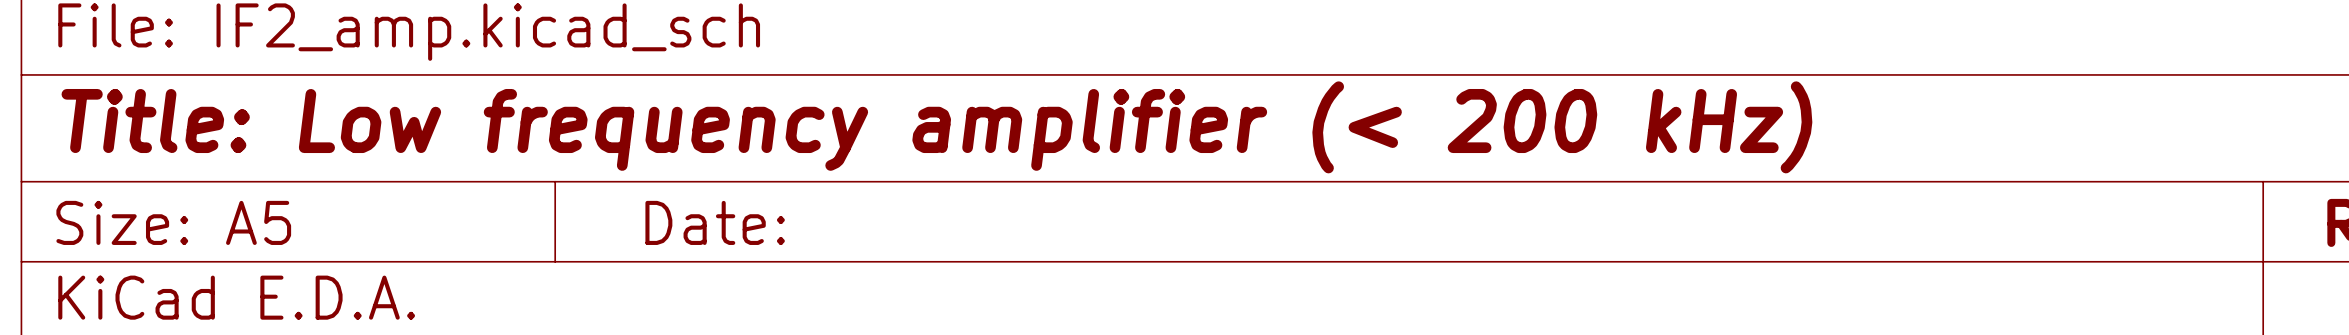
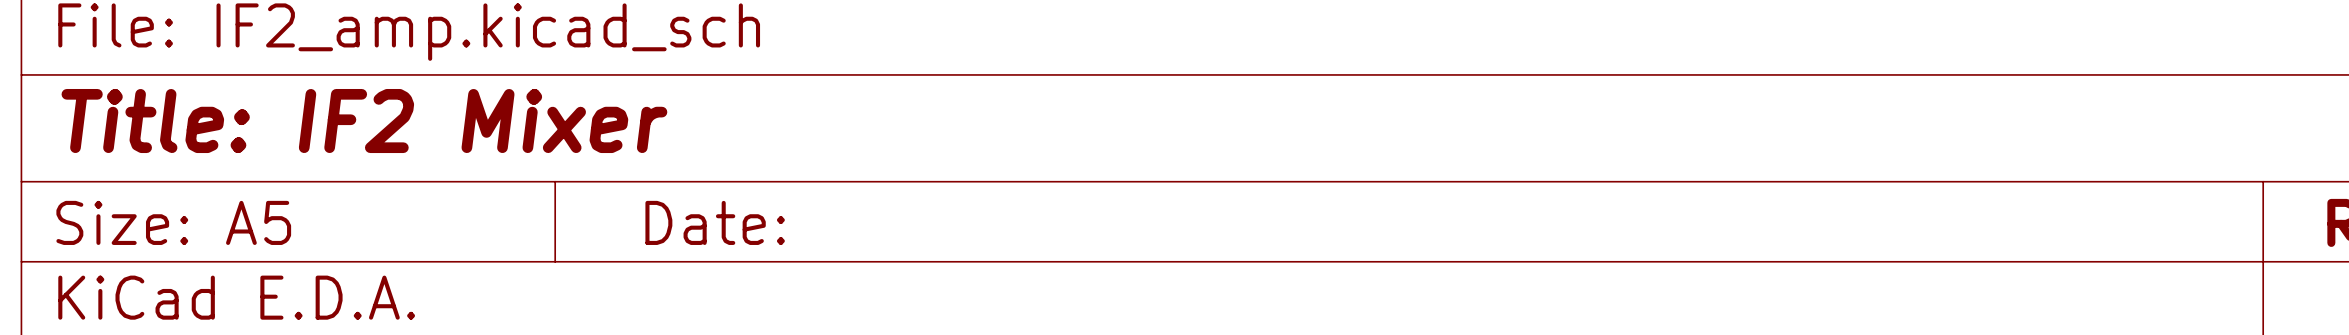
title block: Title: Low frequency amplifier (< 200 kHz) (936, 127) -> Title: IF2 Mixer (364, 121)

